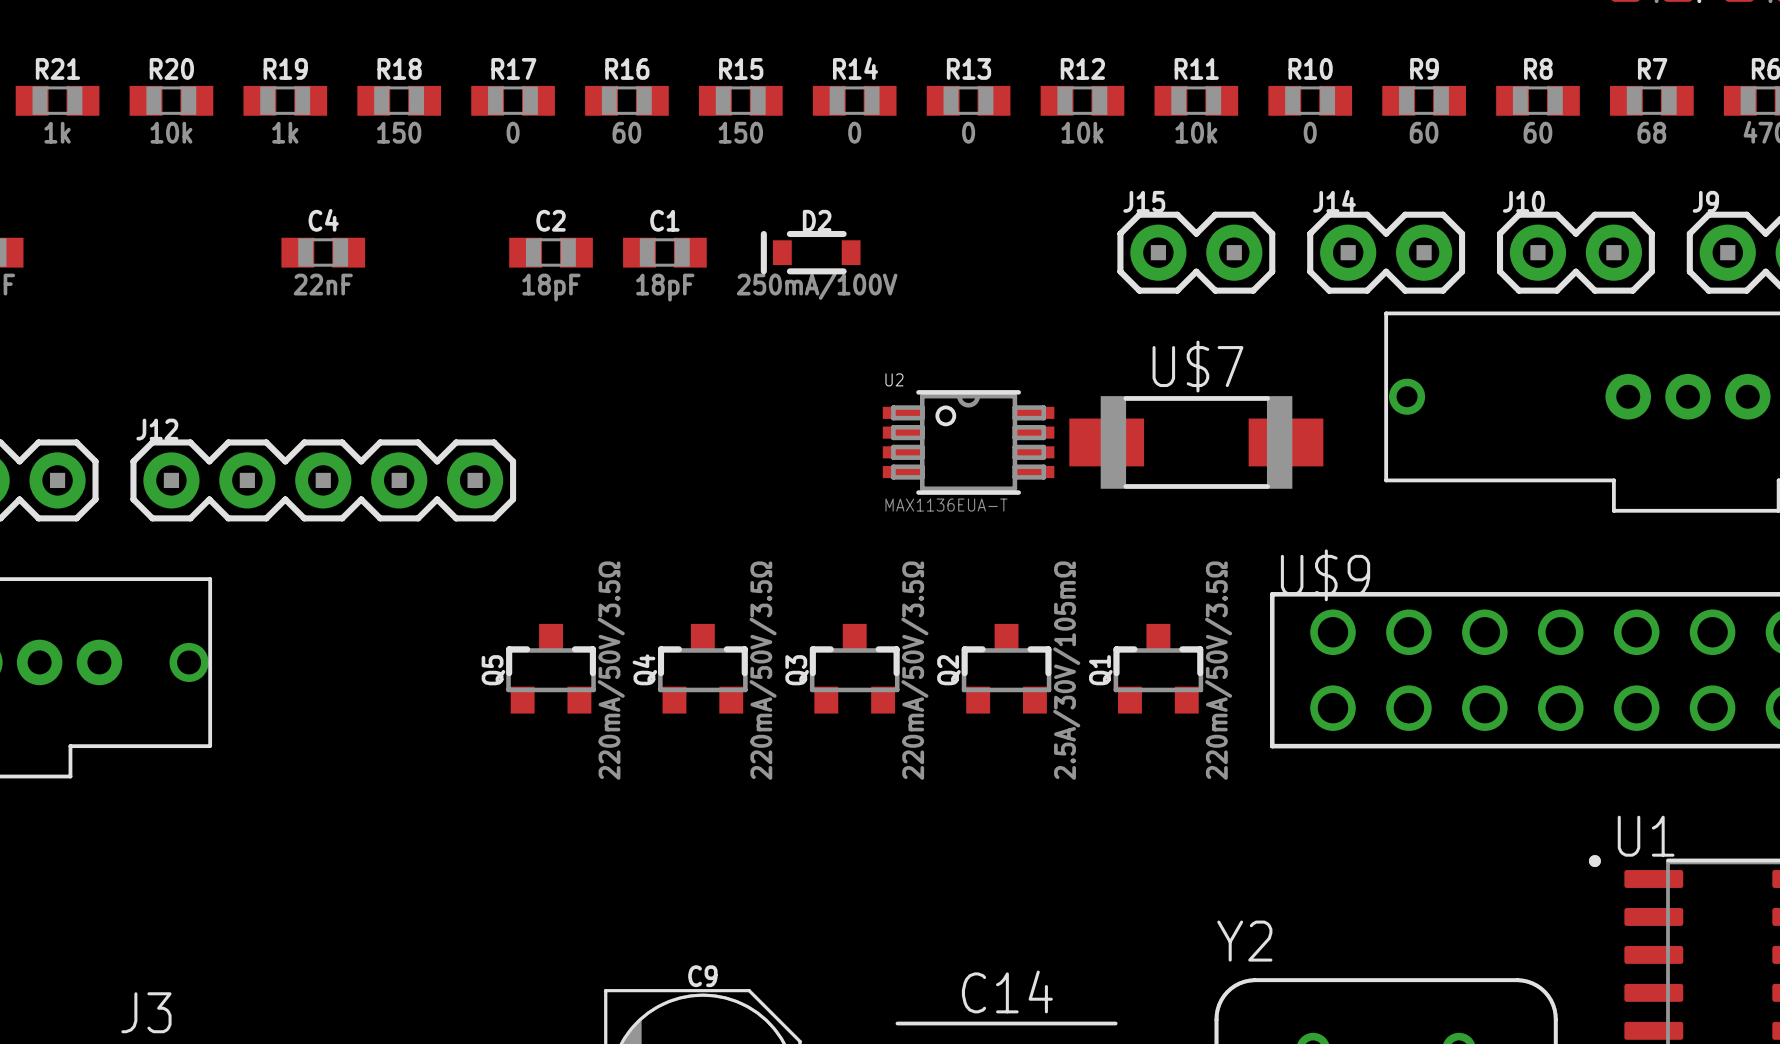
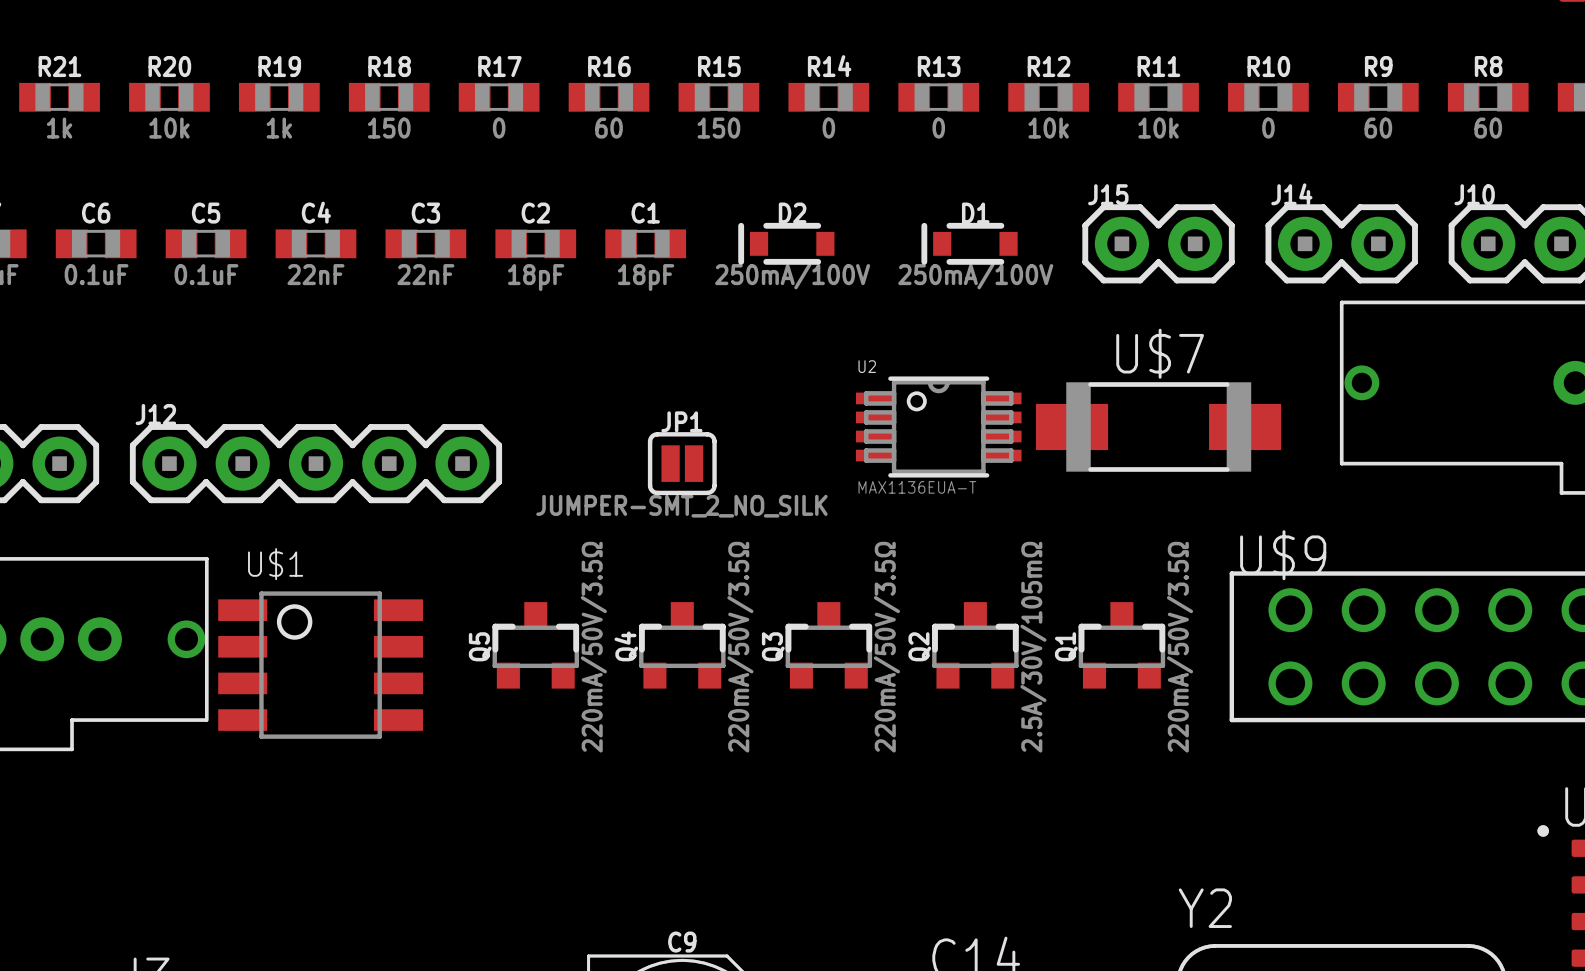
C6: none -> 0.1uF (96, 243)
C5: none -> 0.1uF (206, 243)
C3: none -> 22nF (425, 243)
D1: none -> 250mA/100V (969, 243)
JP1: none -> JUMPER-SMT_2_NO_SILK (682, 463)
U$1: none -> (320, 665)

